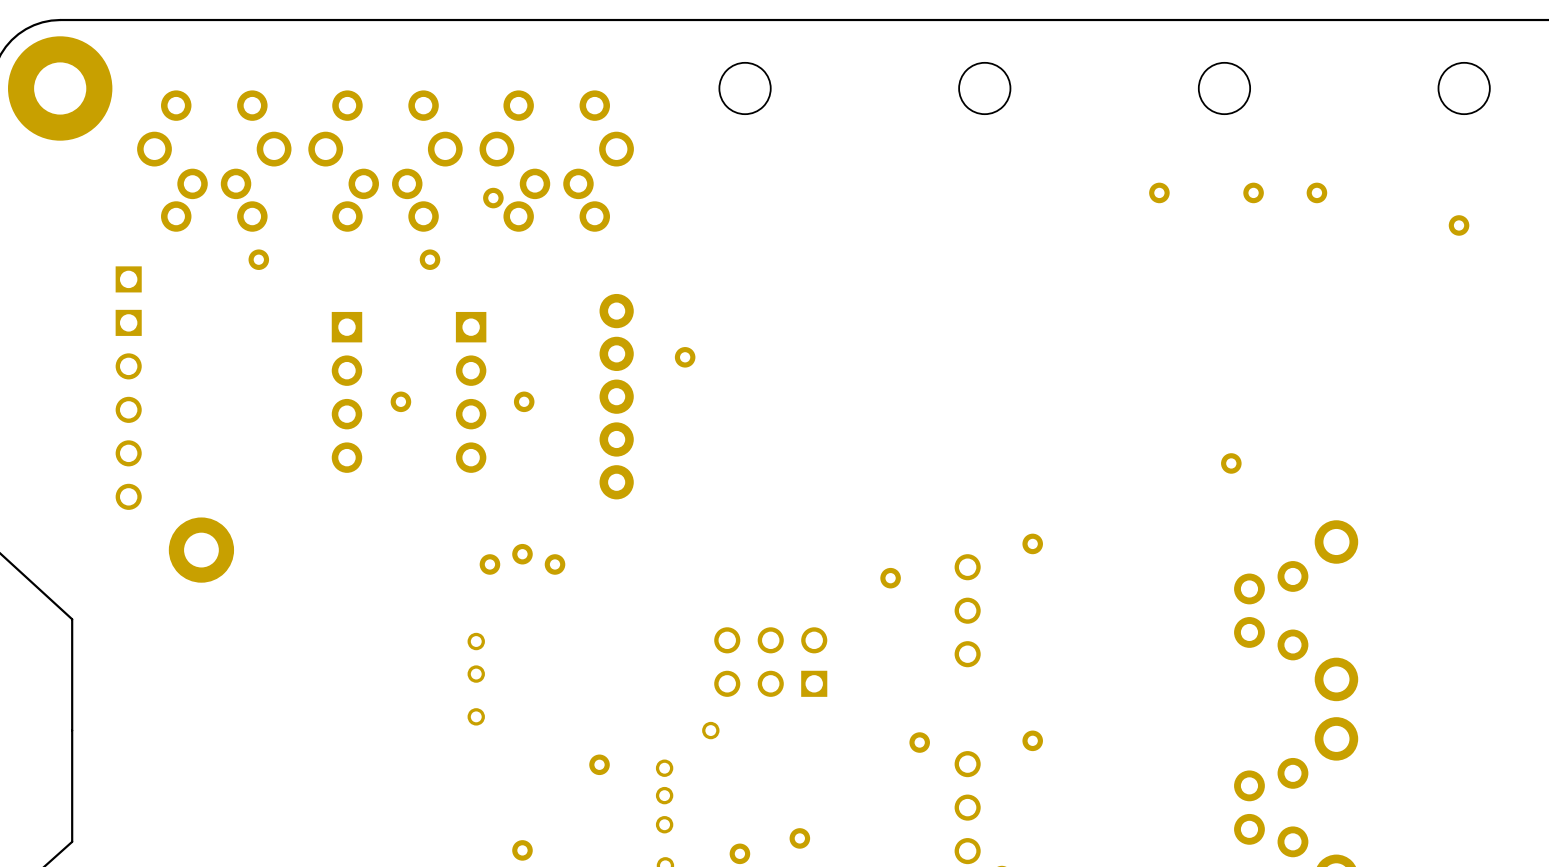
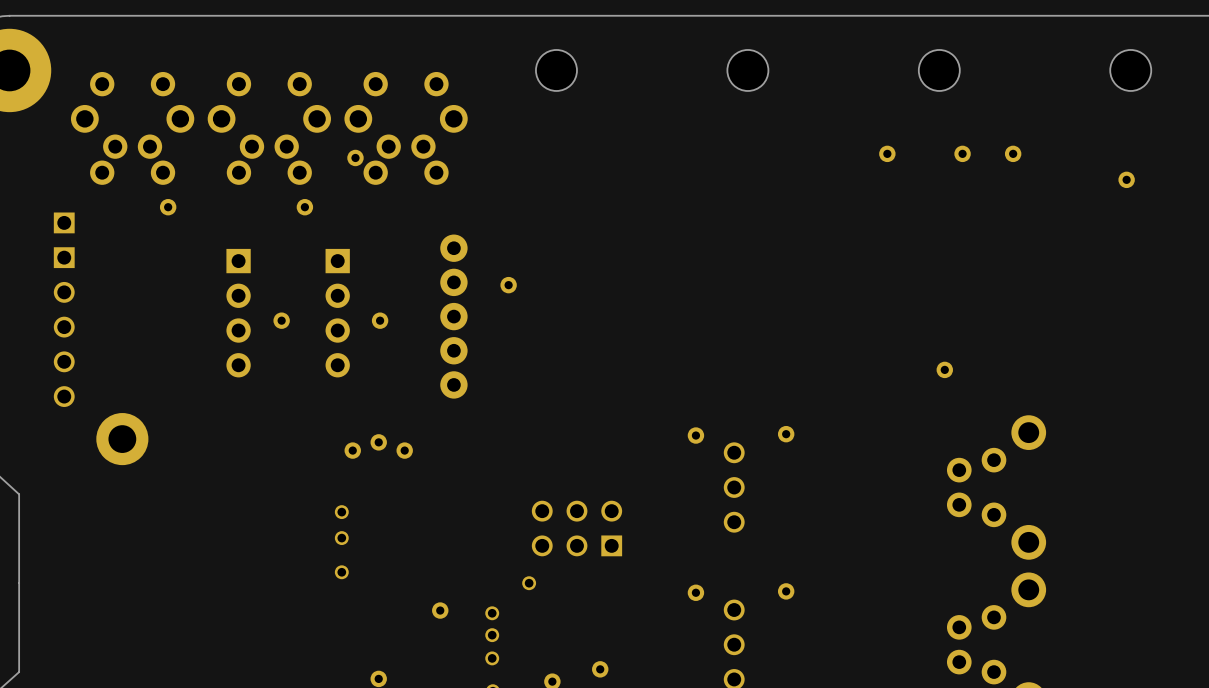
part position: (890, 578) -> (695, 435)

